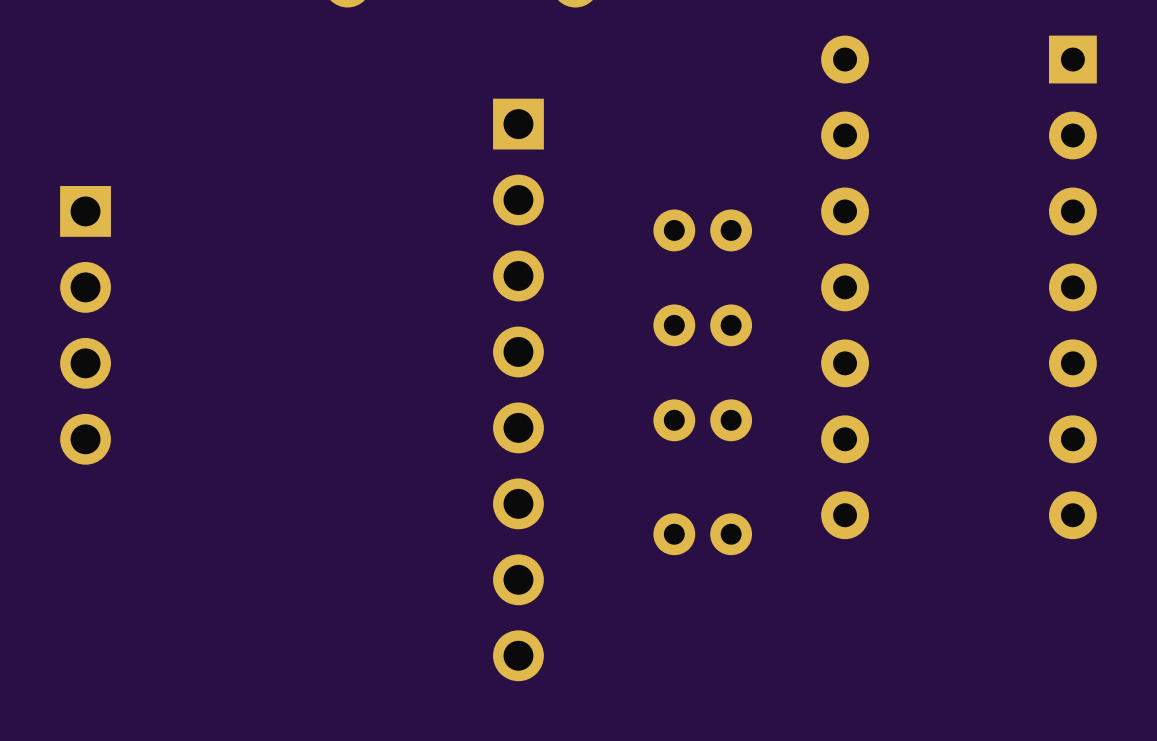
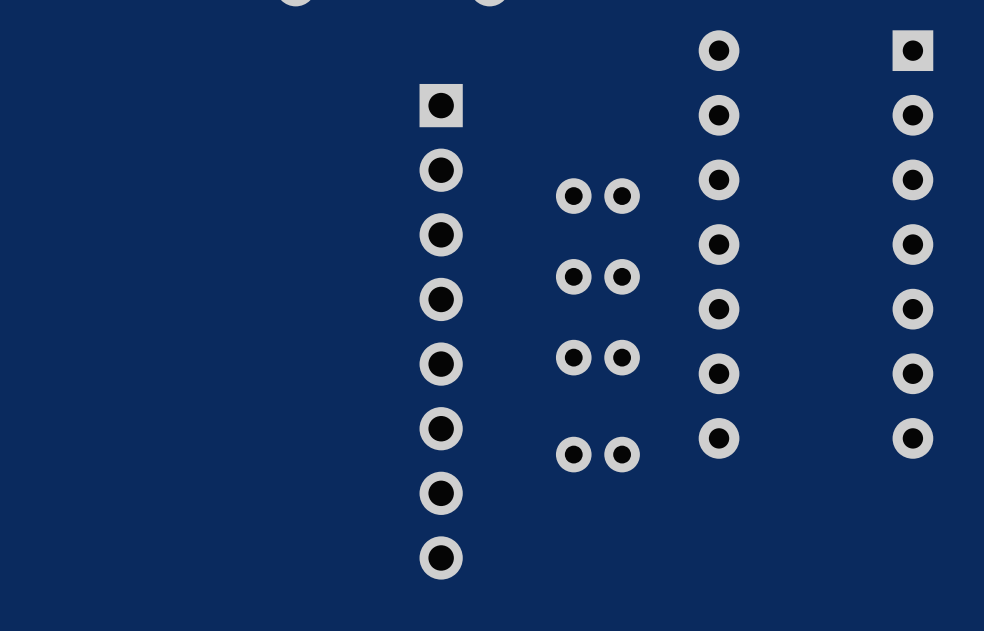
part: (85, 325) -> none

